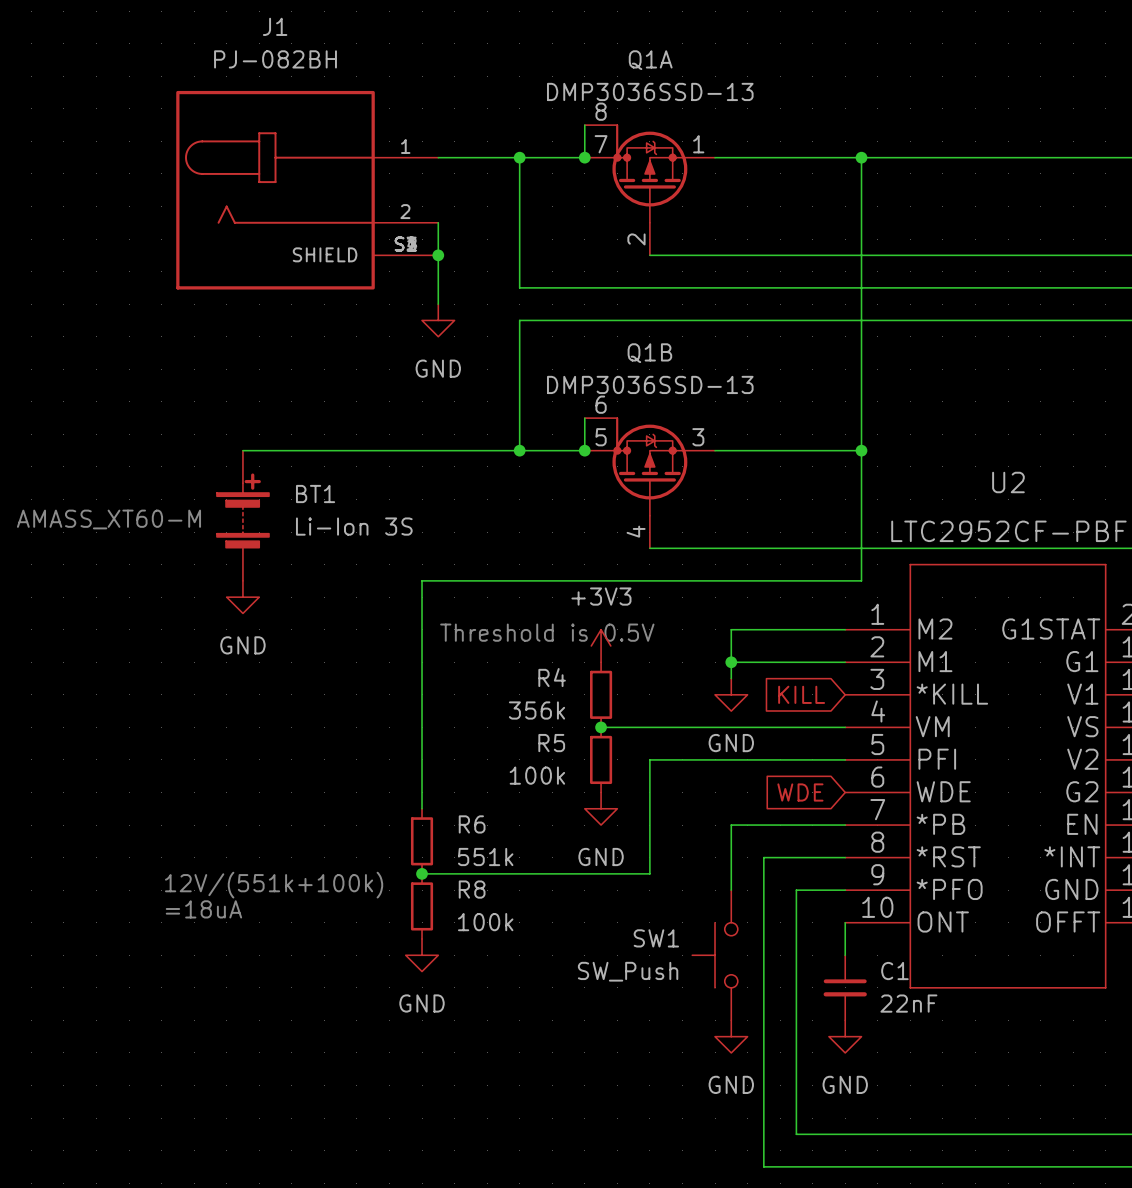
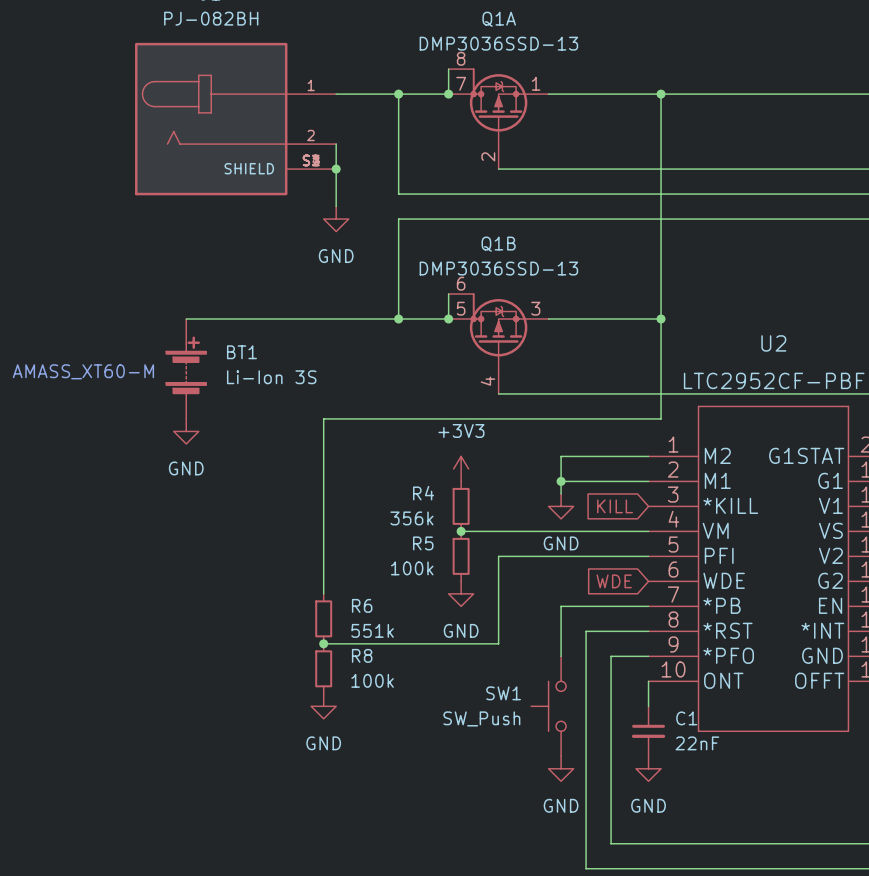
text: Threshold is 0.5V (547, 632) -> none
text: 12V/(551k+100k) (274, 885) -> none
text: =18uA (203, 909) -> none

